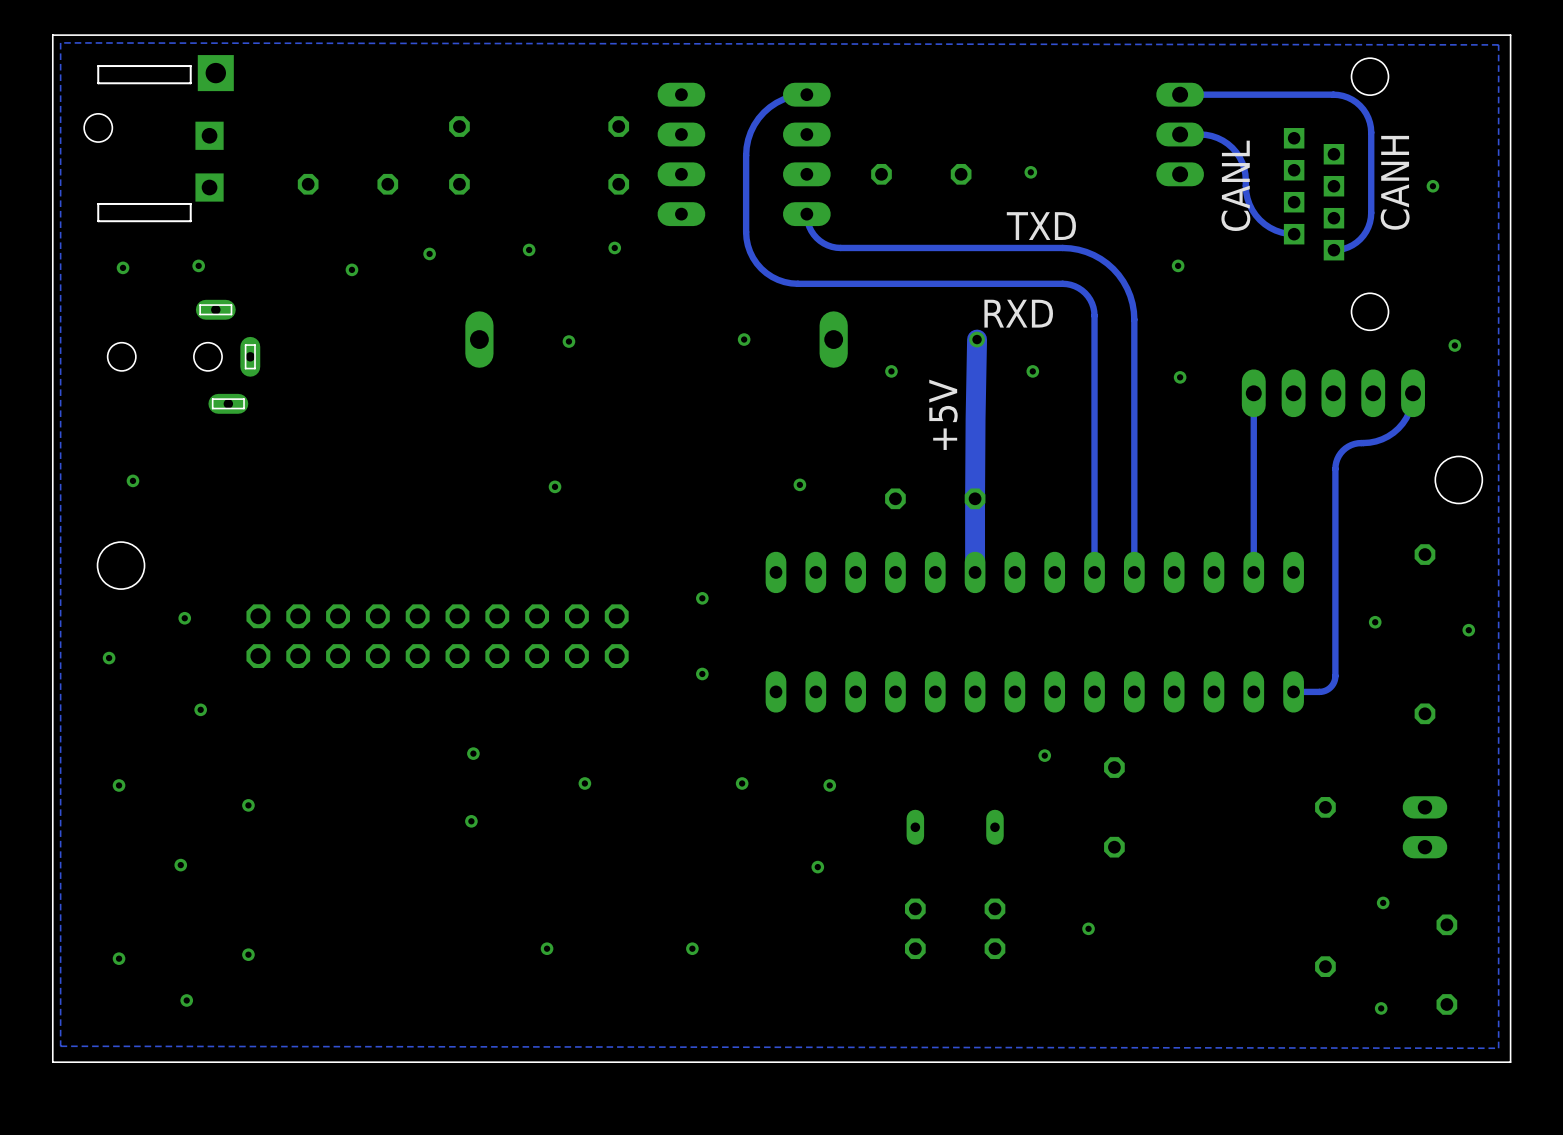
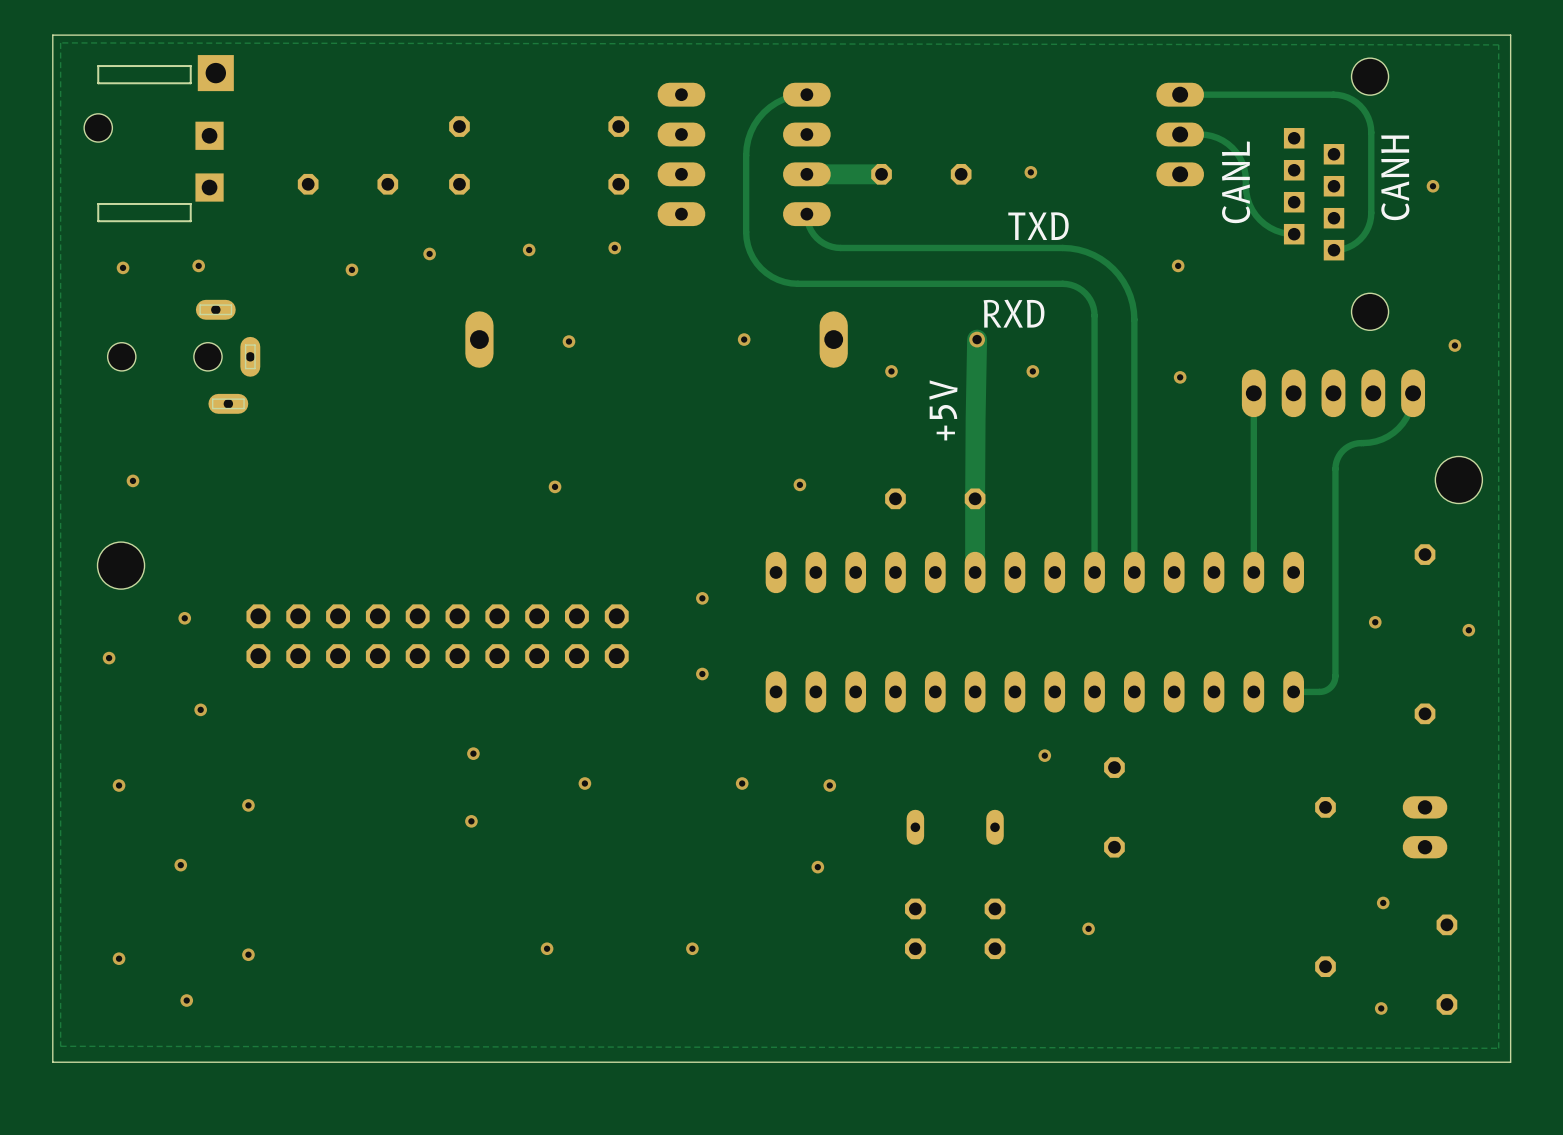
track: none -> (881, 174) (806, 174)

